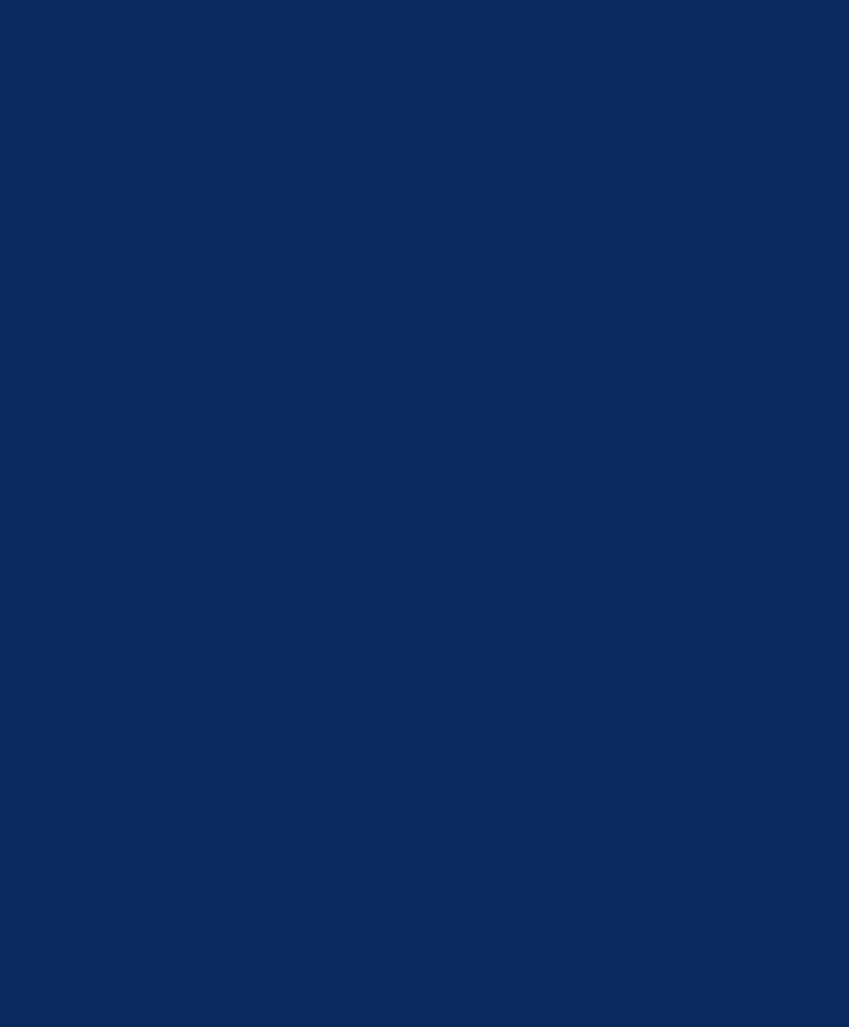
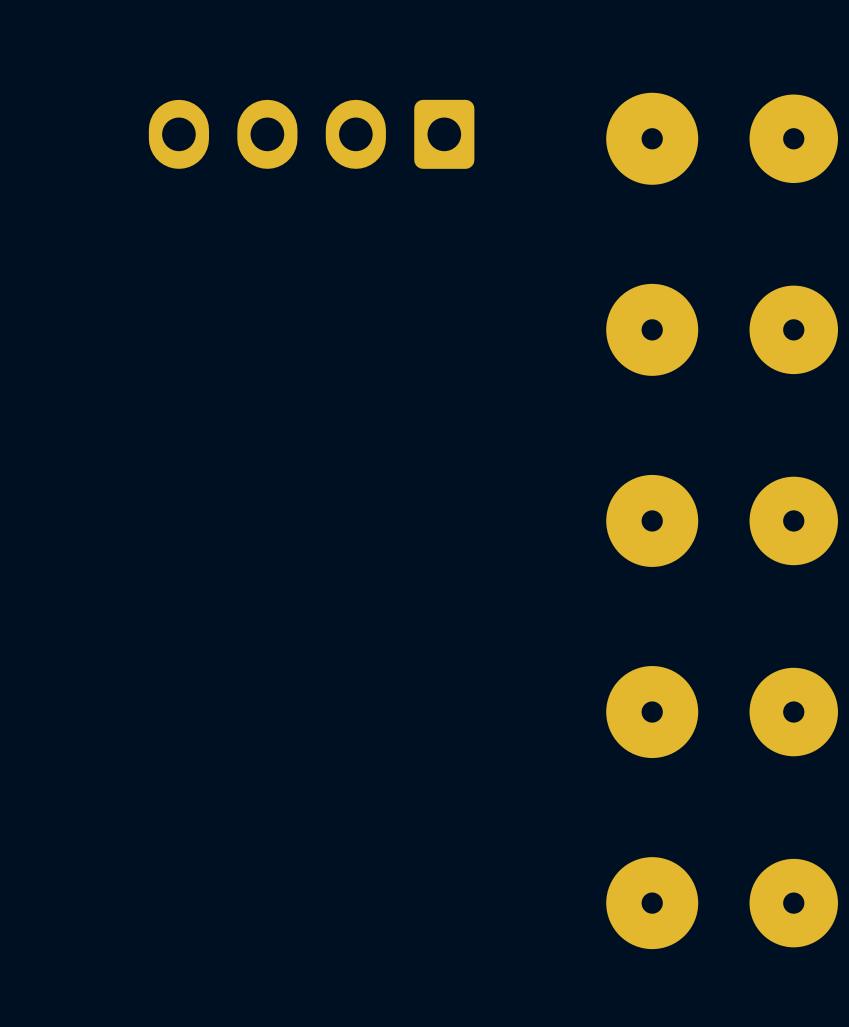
part: none -> (311, 134)
part: none -> (722, 138)
part: none -> (722, 329)
part: none -> (722, 520)
part: none -> (722, 712)
part: none -> (722, 903)

